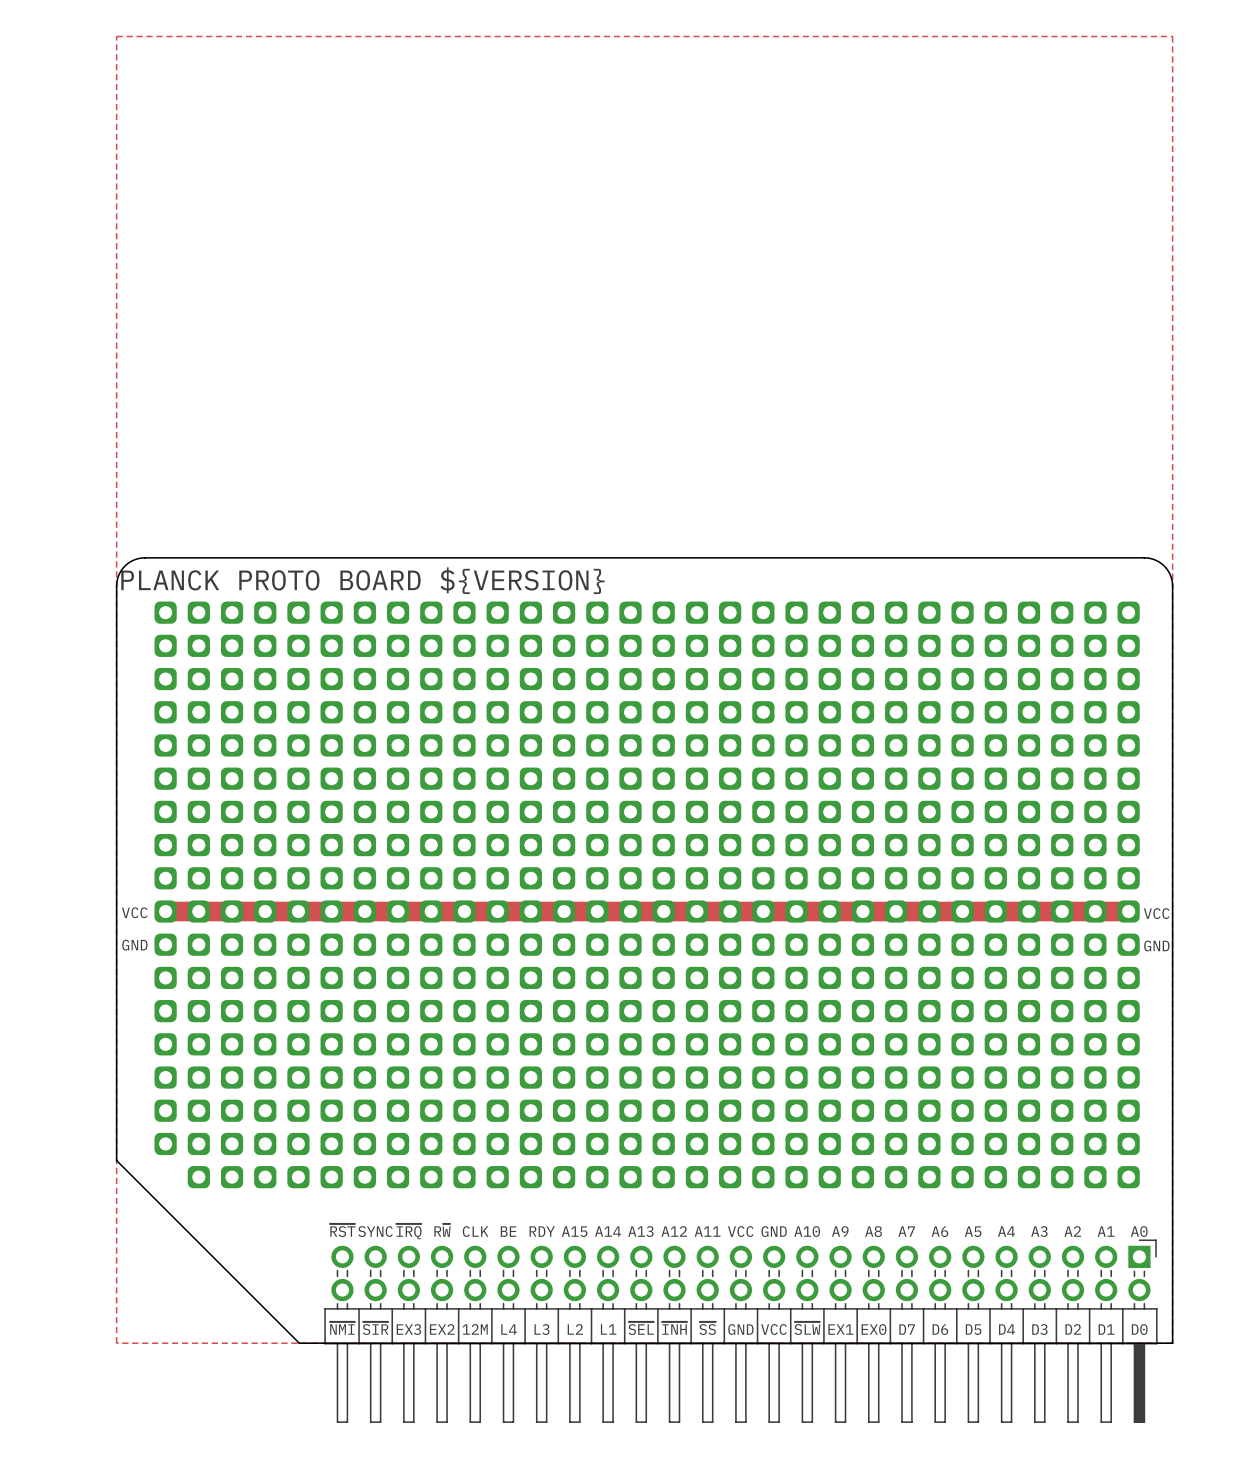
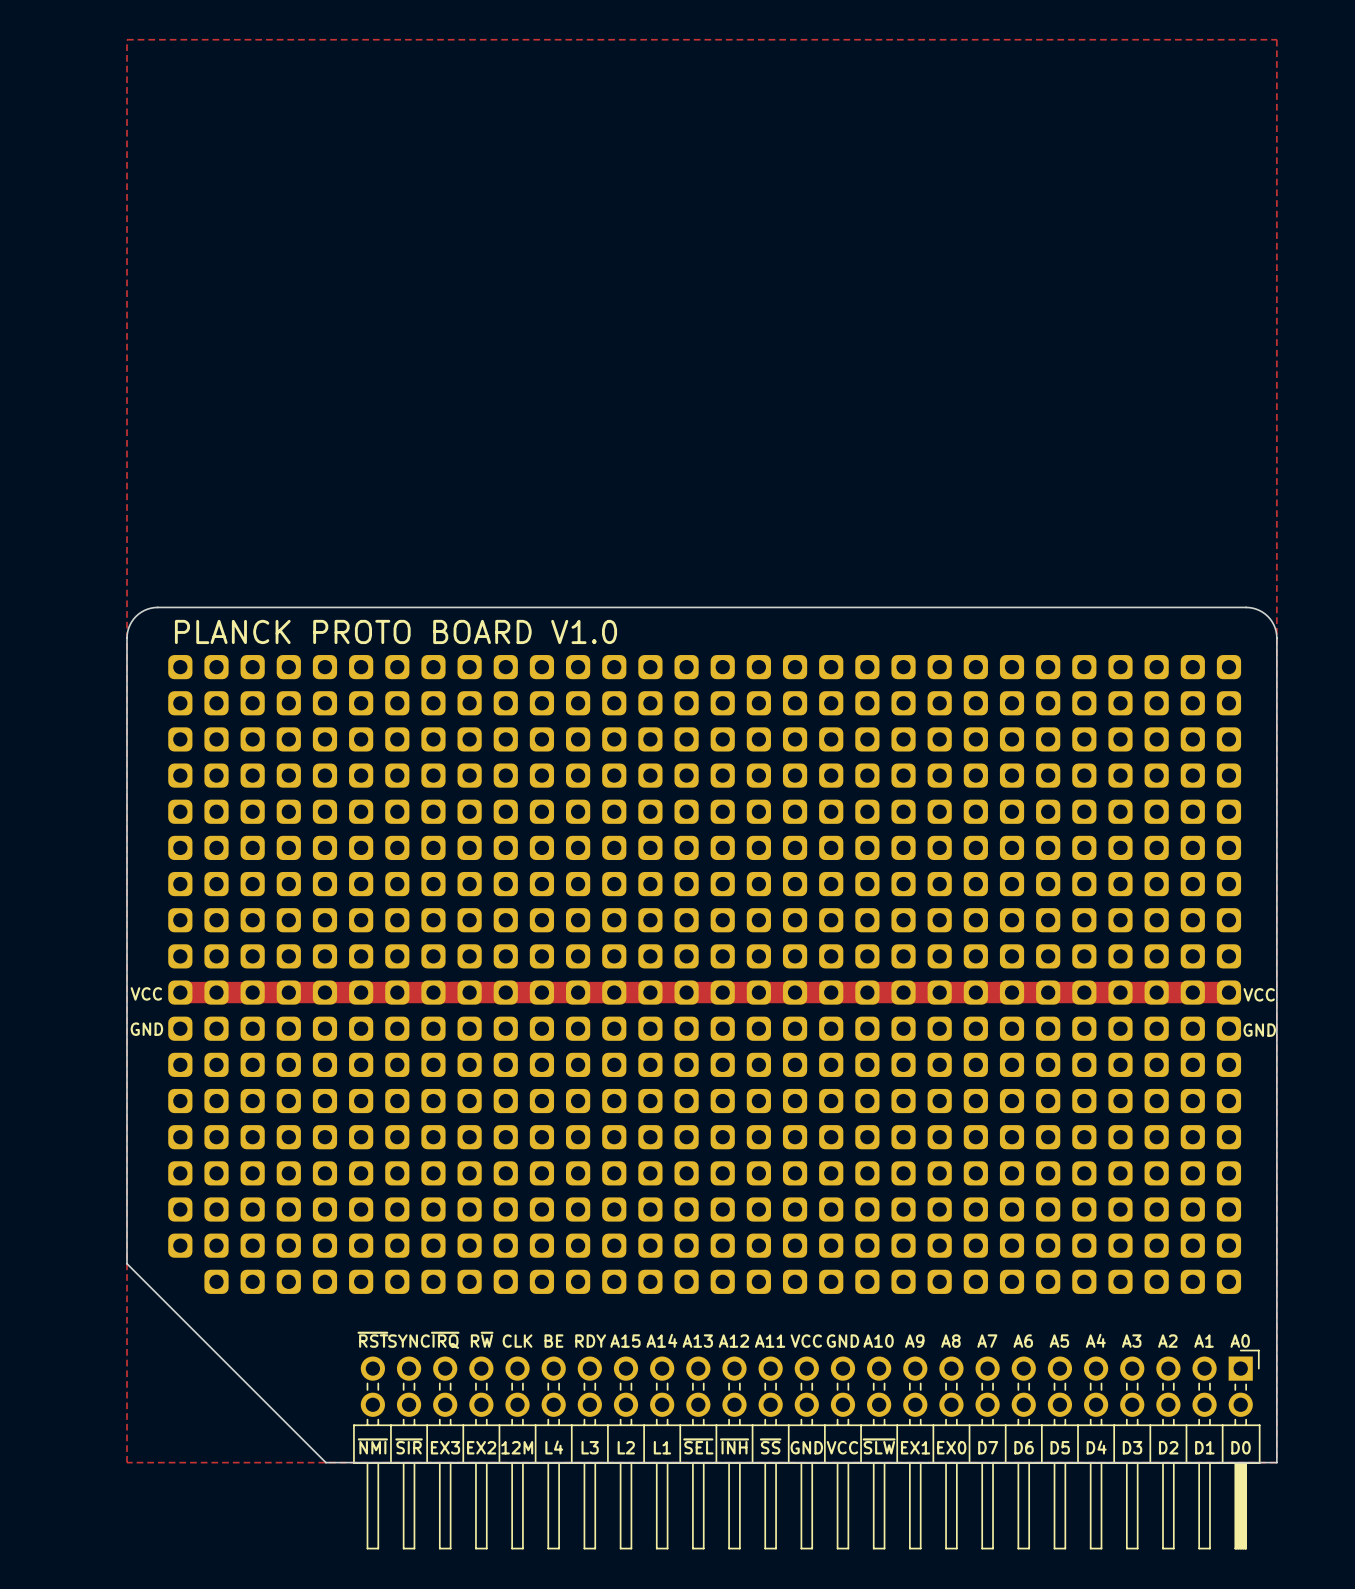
text: PLANCK PROTO BOARD ${VERSION} (362, 580) -> PLANCK PROTO BOARD V1.0 (396, 631)

